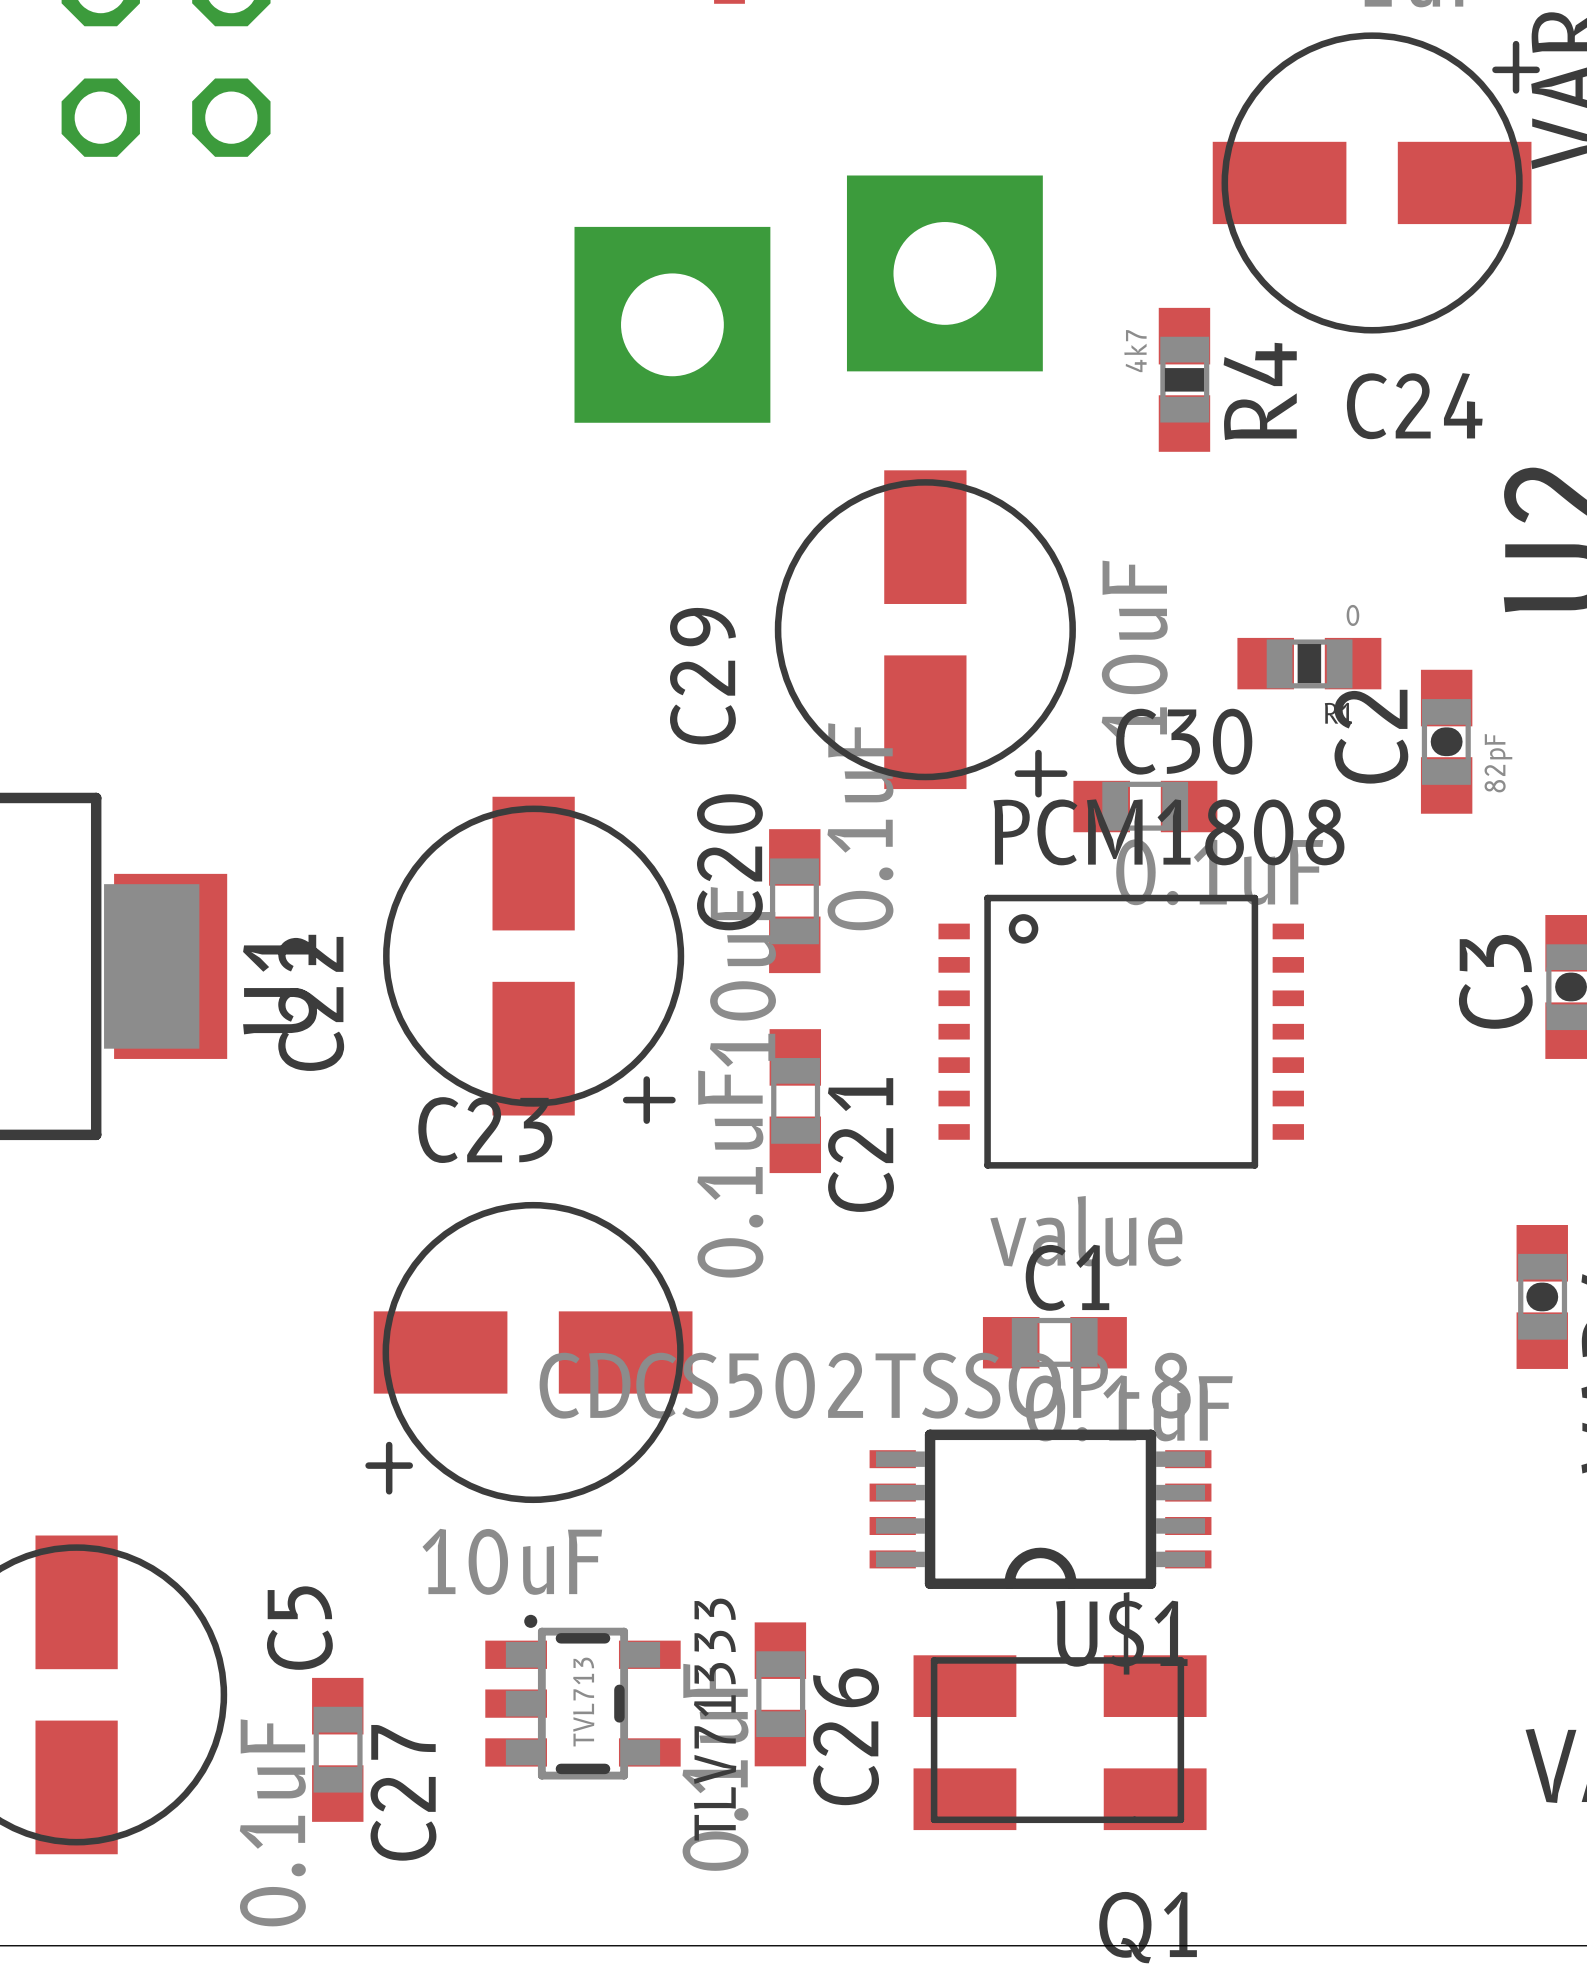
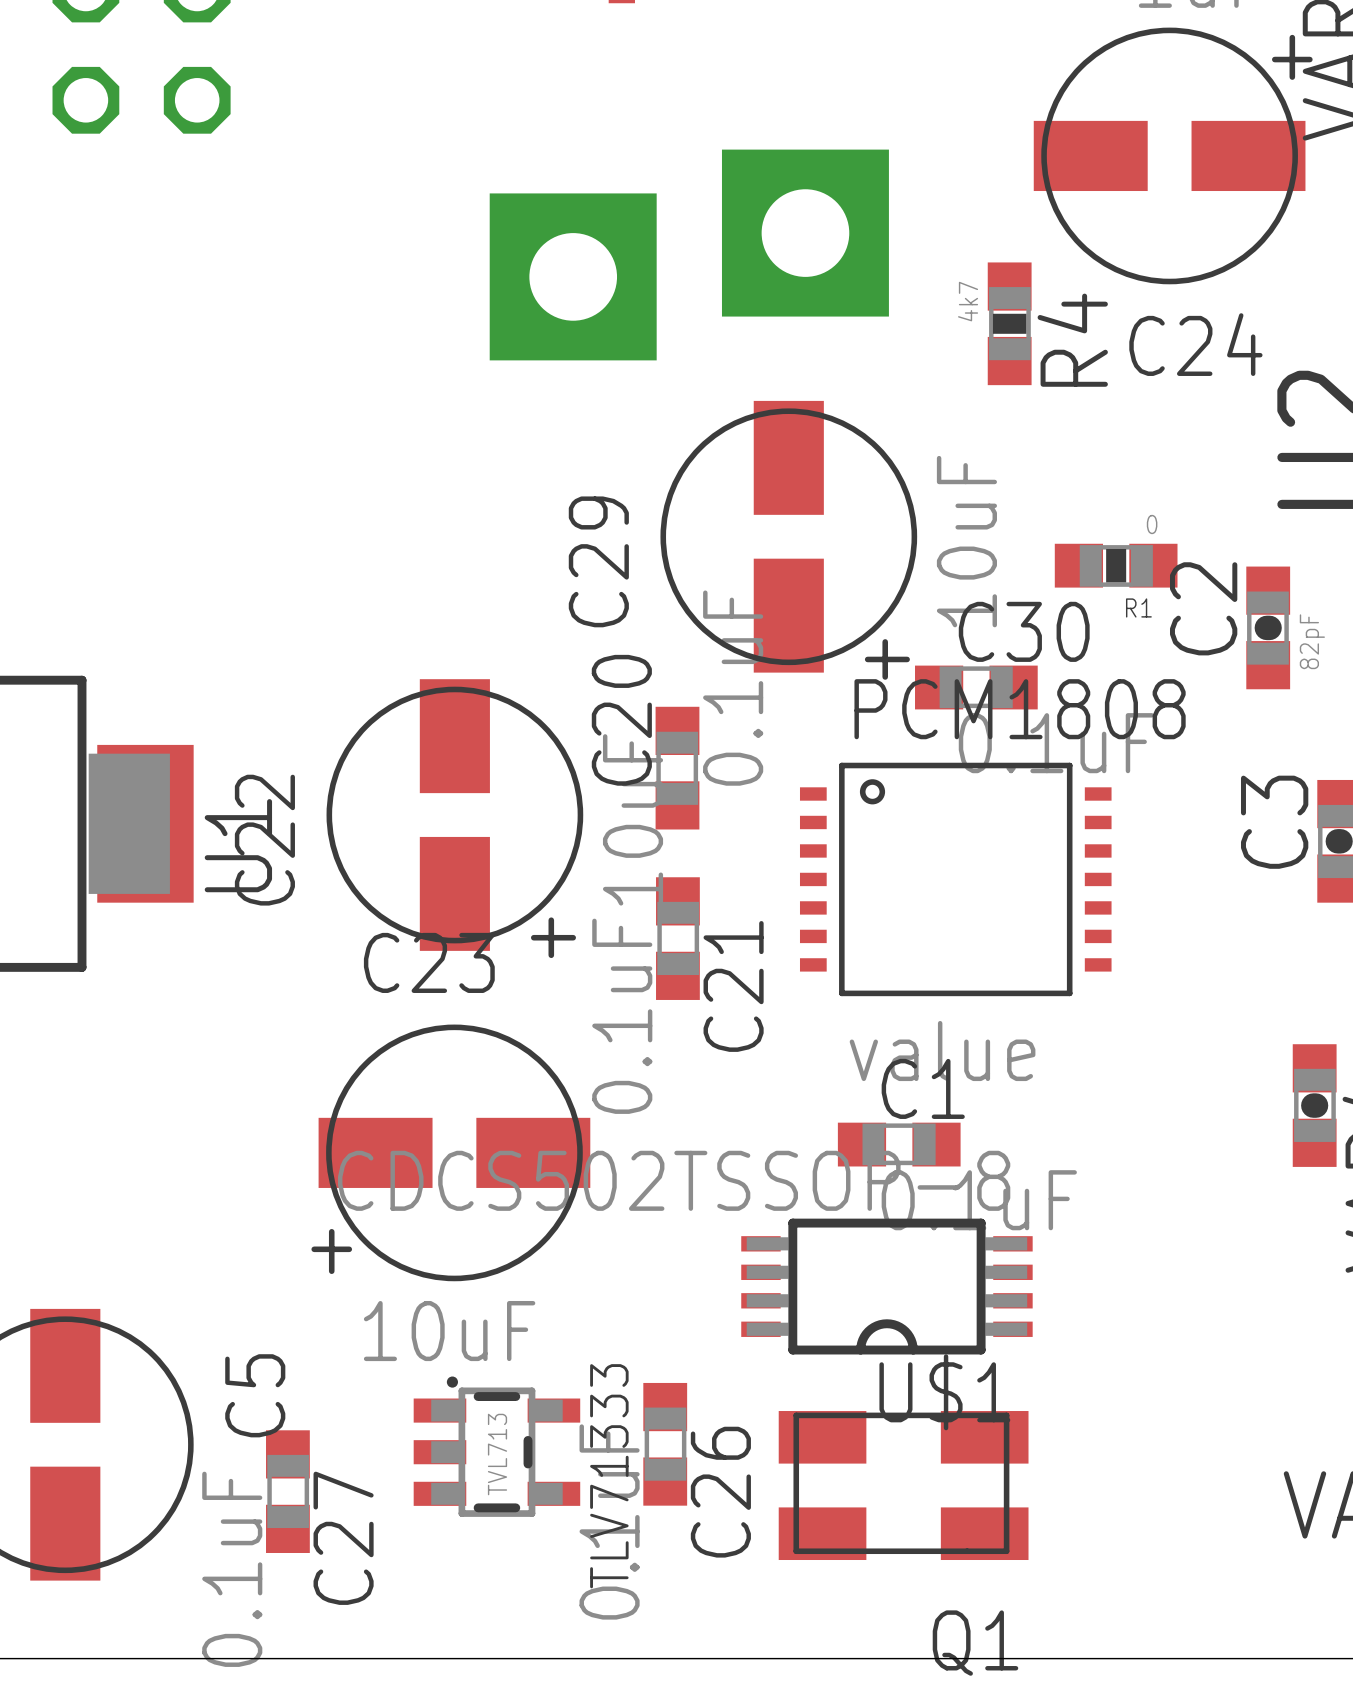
C2 position: (1446, 741) -> (1268, 627)

